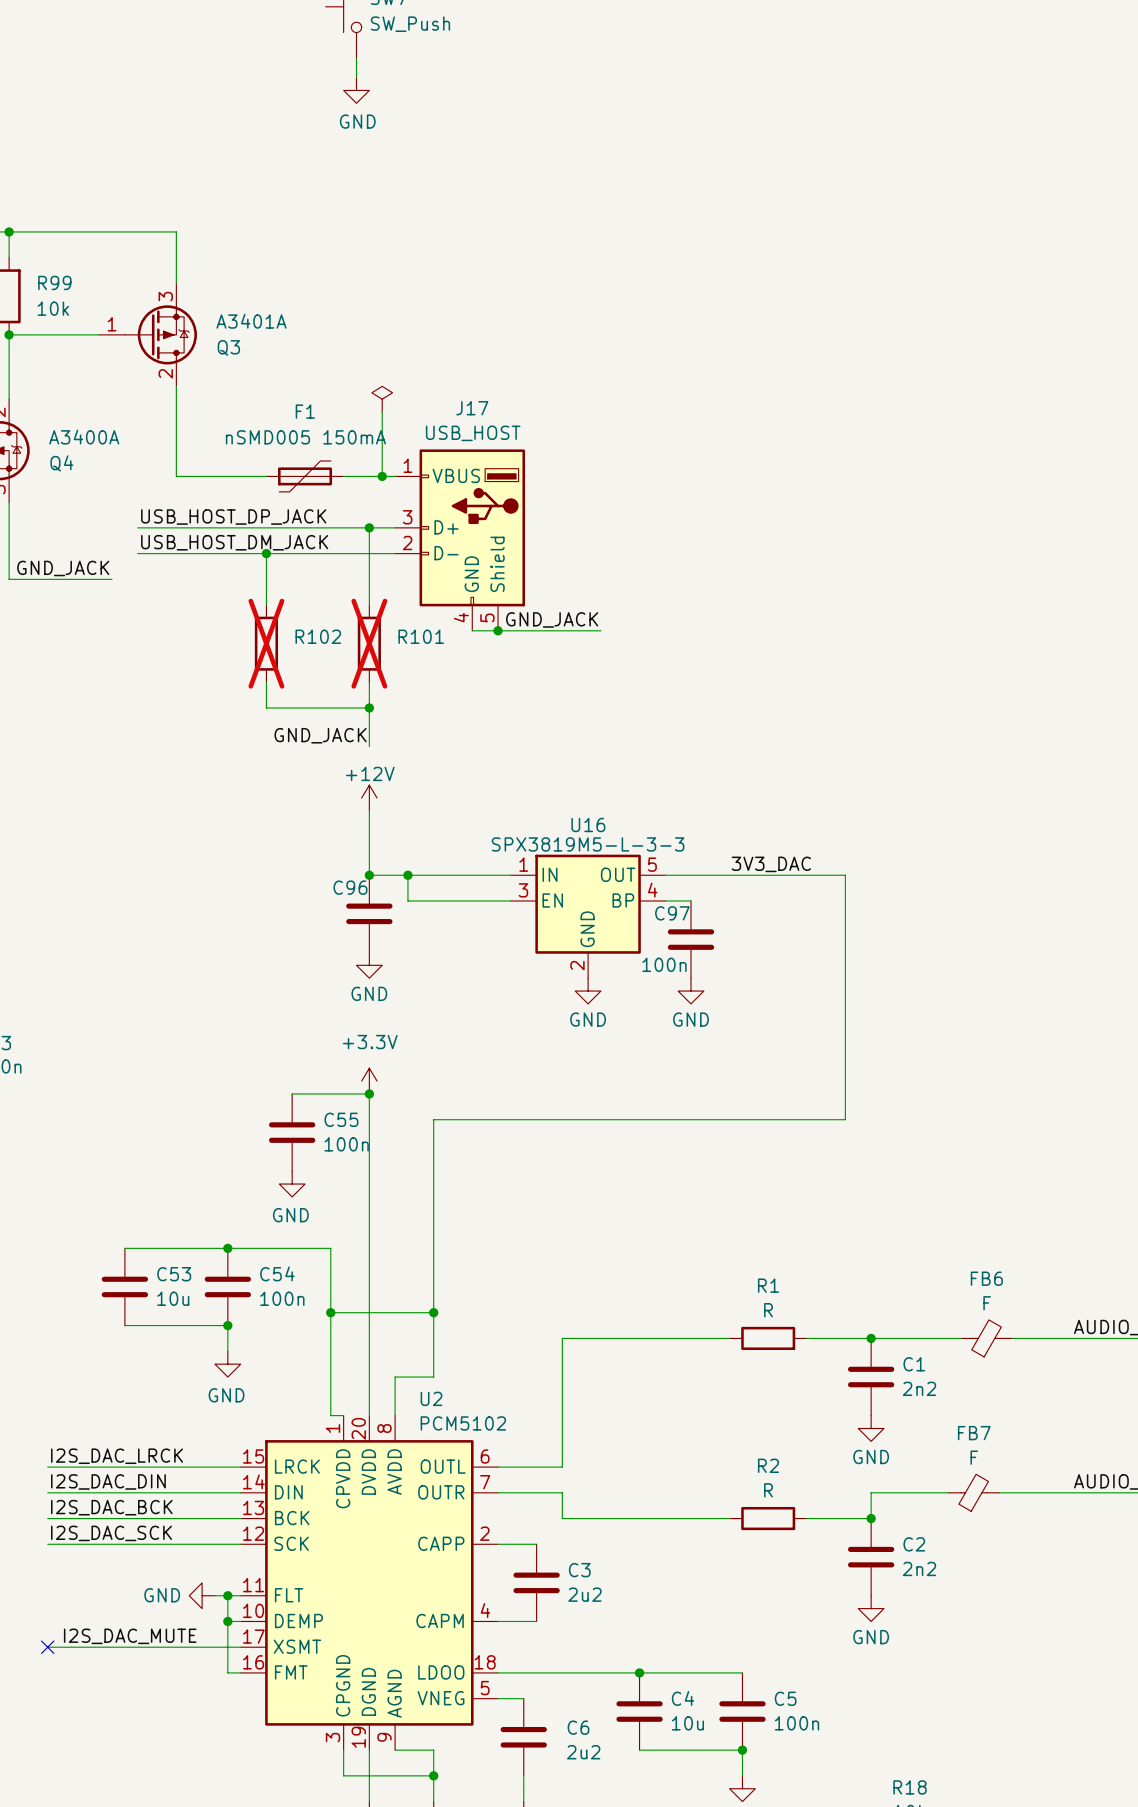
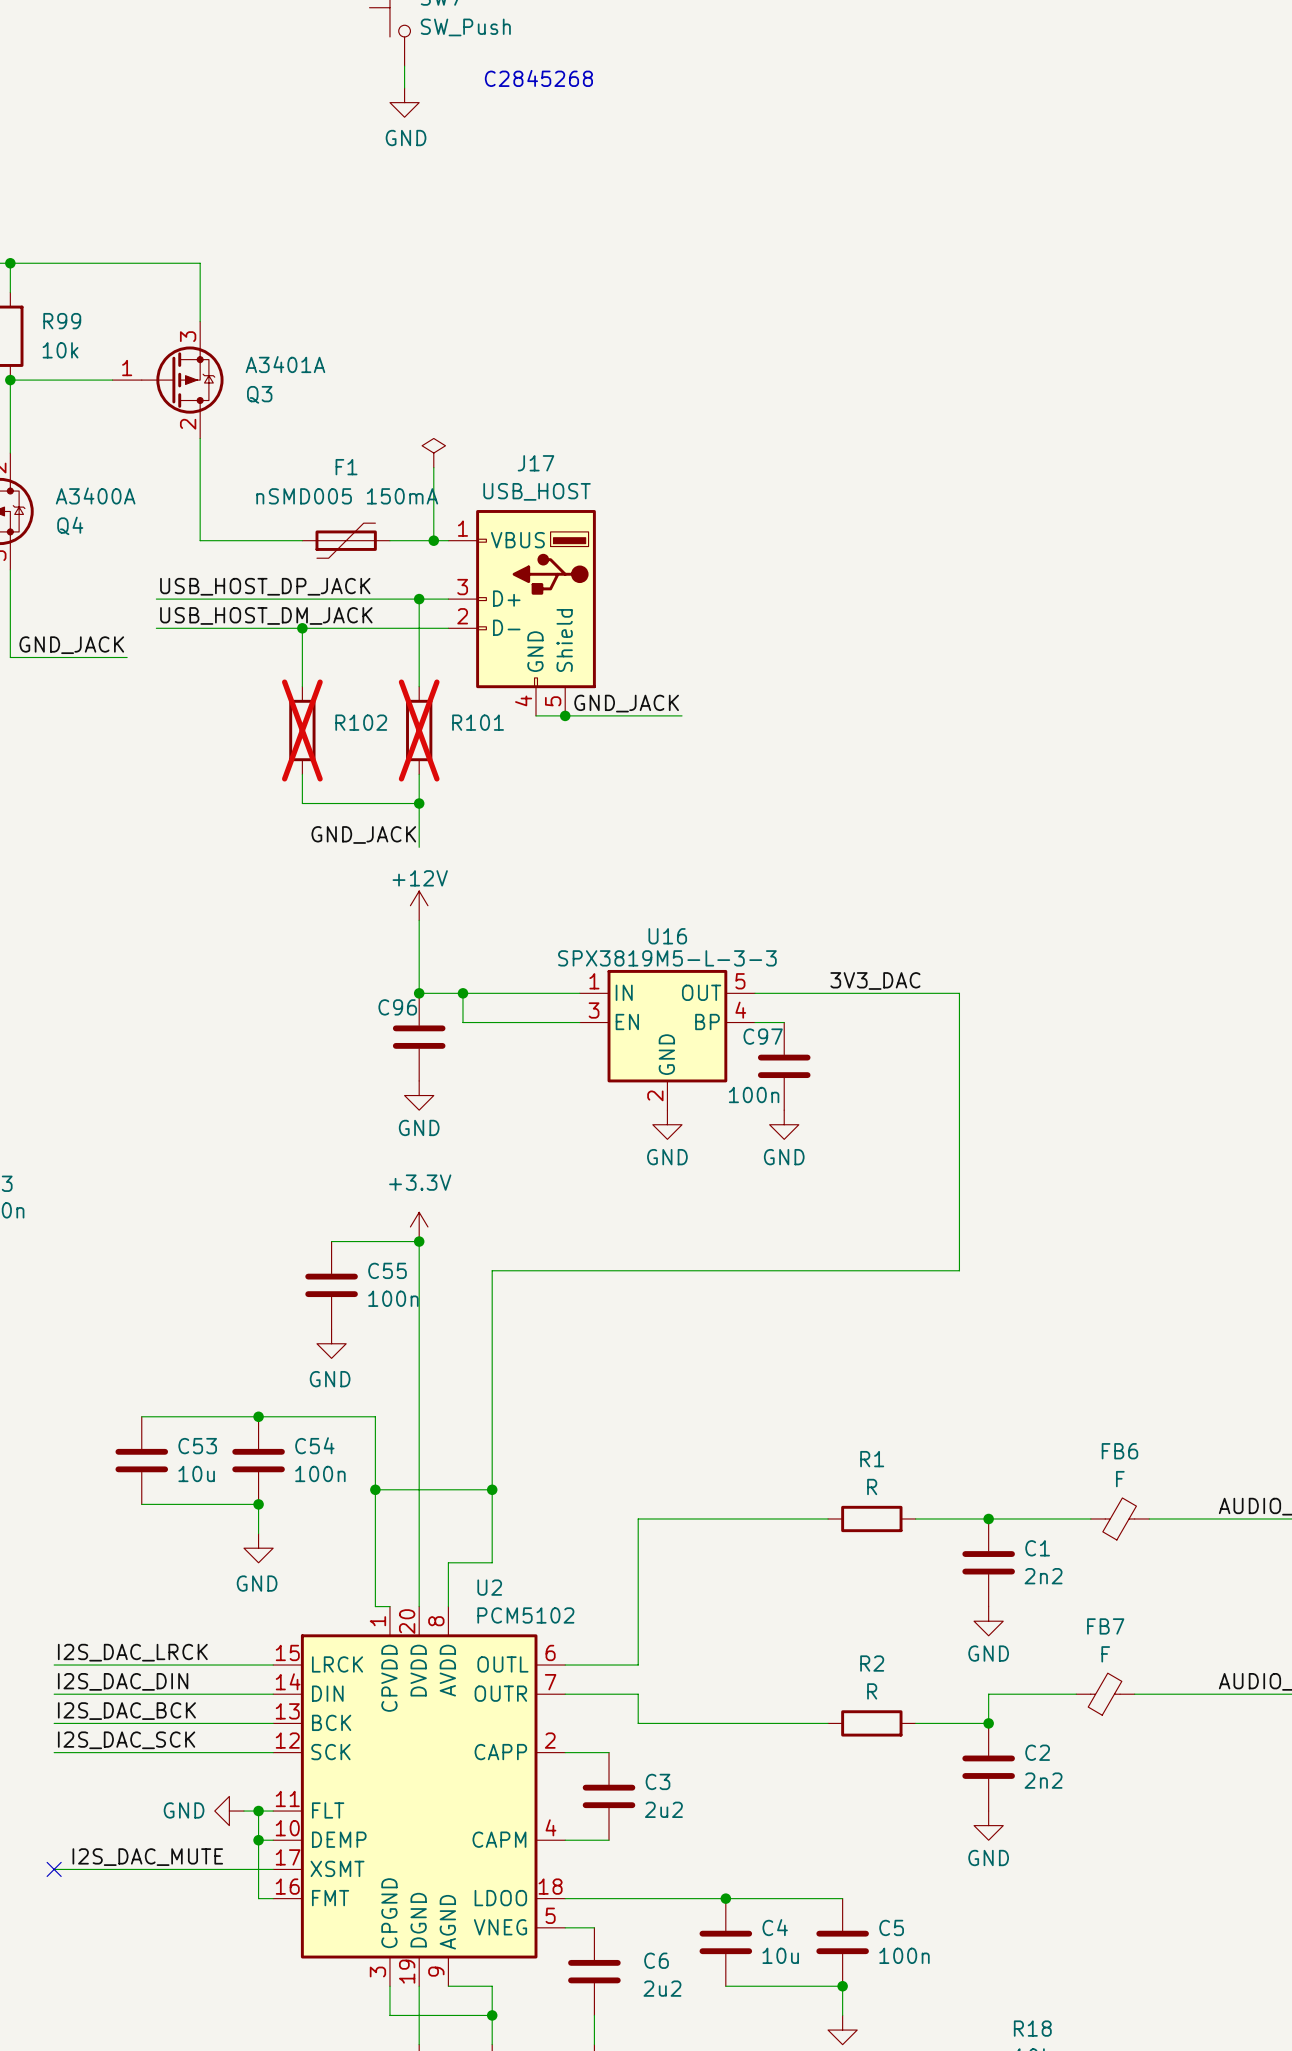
text: none -> C2845268 (538, 78)

